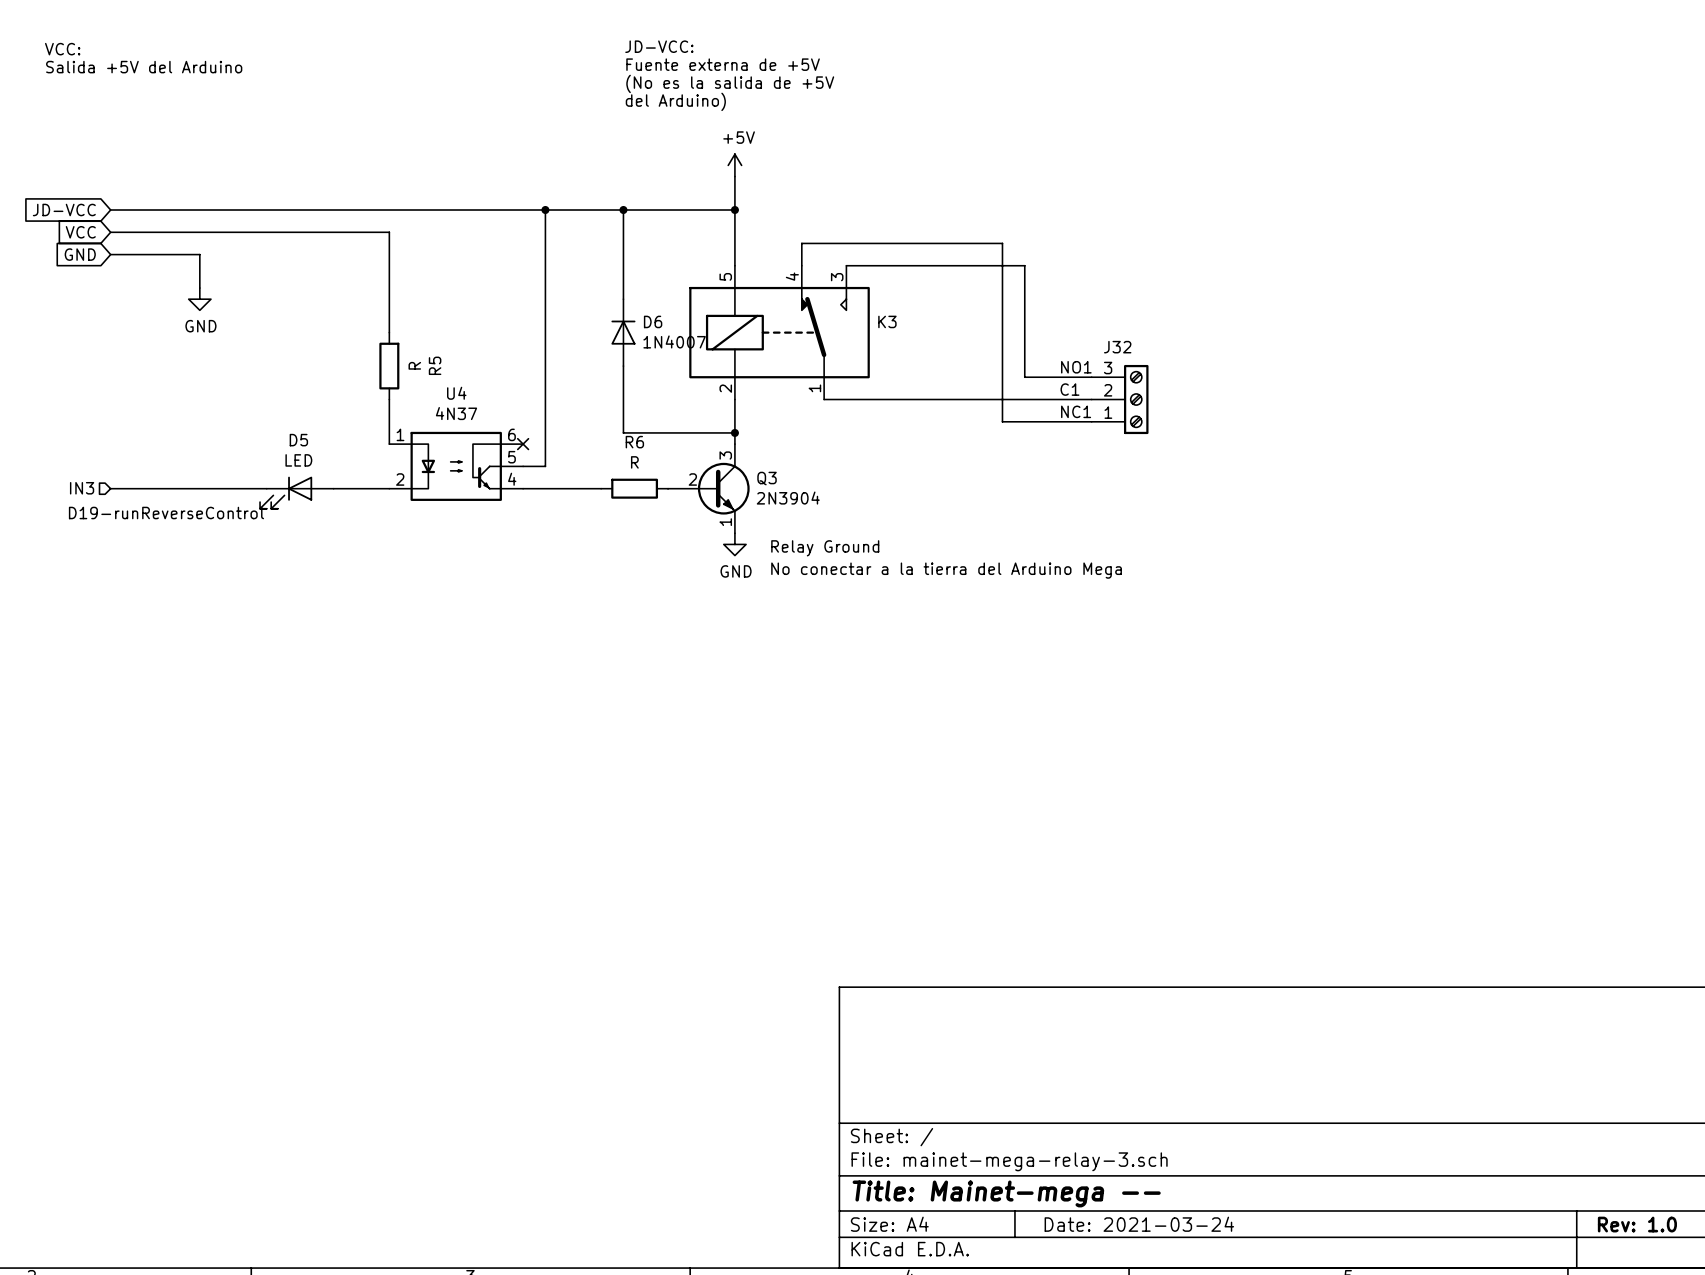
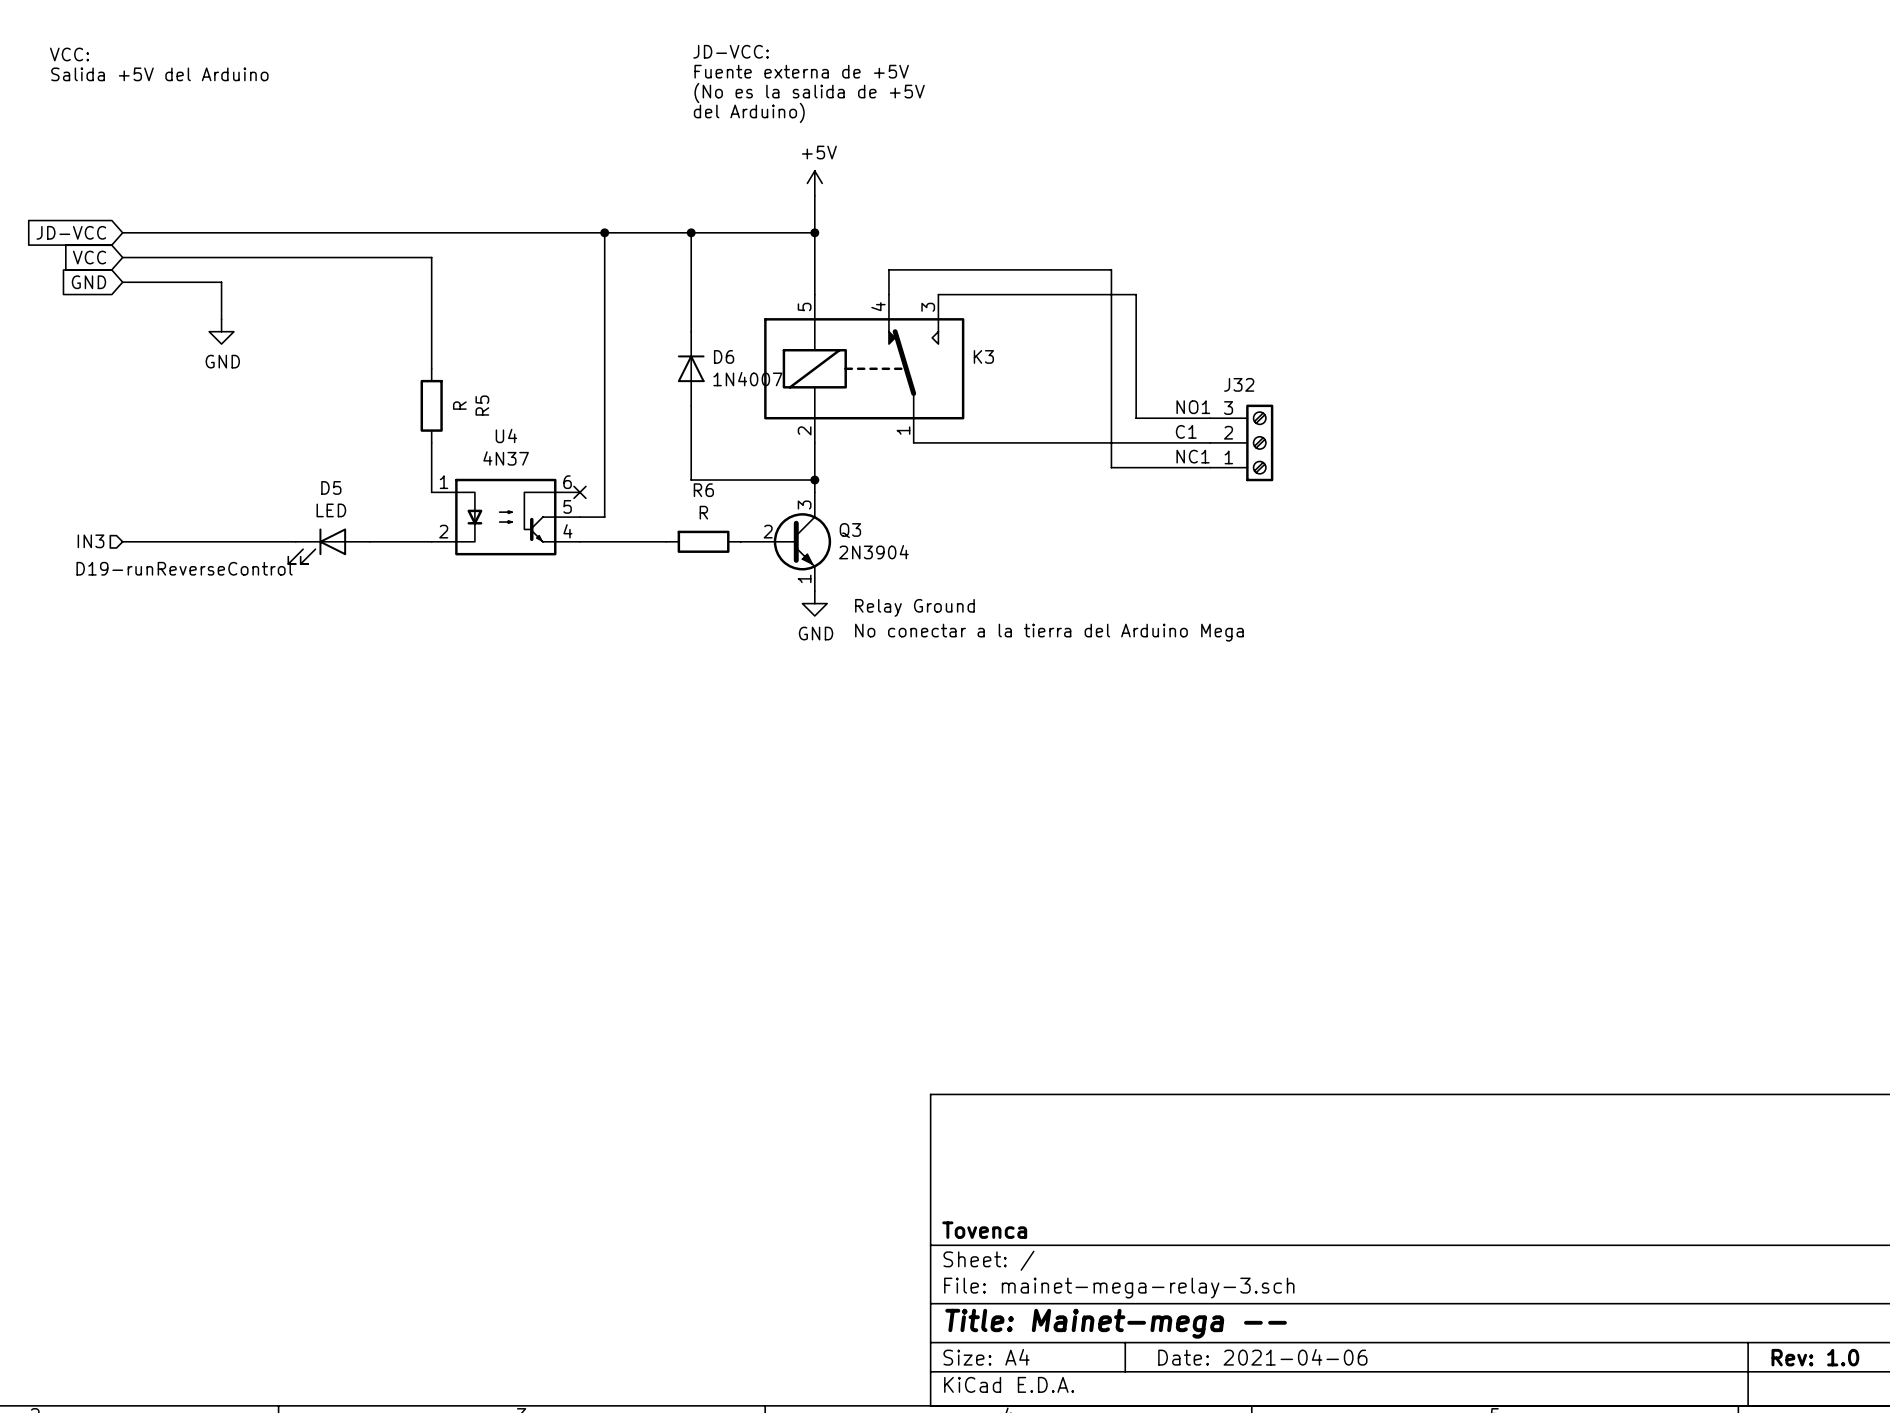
title block: none -> Tovenca (984, 1230)
title block: Date: 2021-03-24 (1139, 1224) -> Date: 2021-04-06 (1262, 1357)

